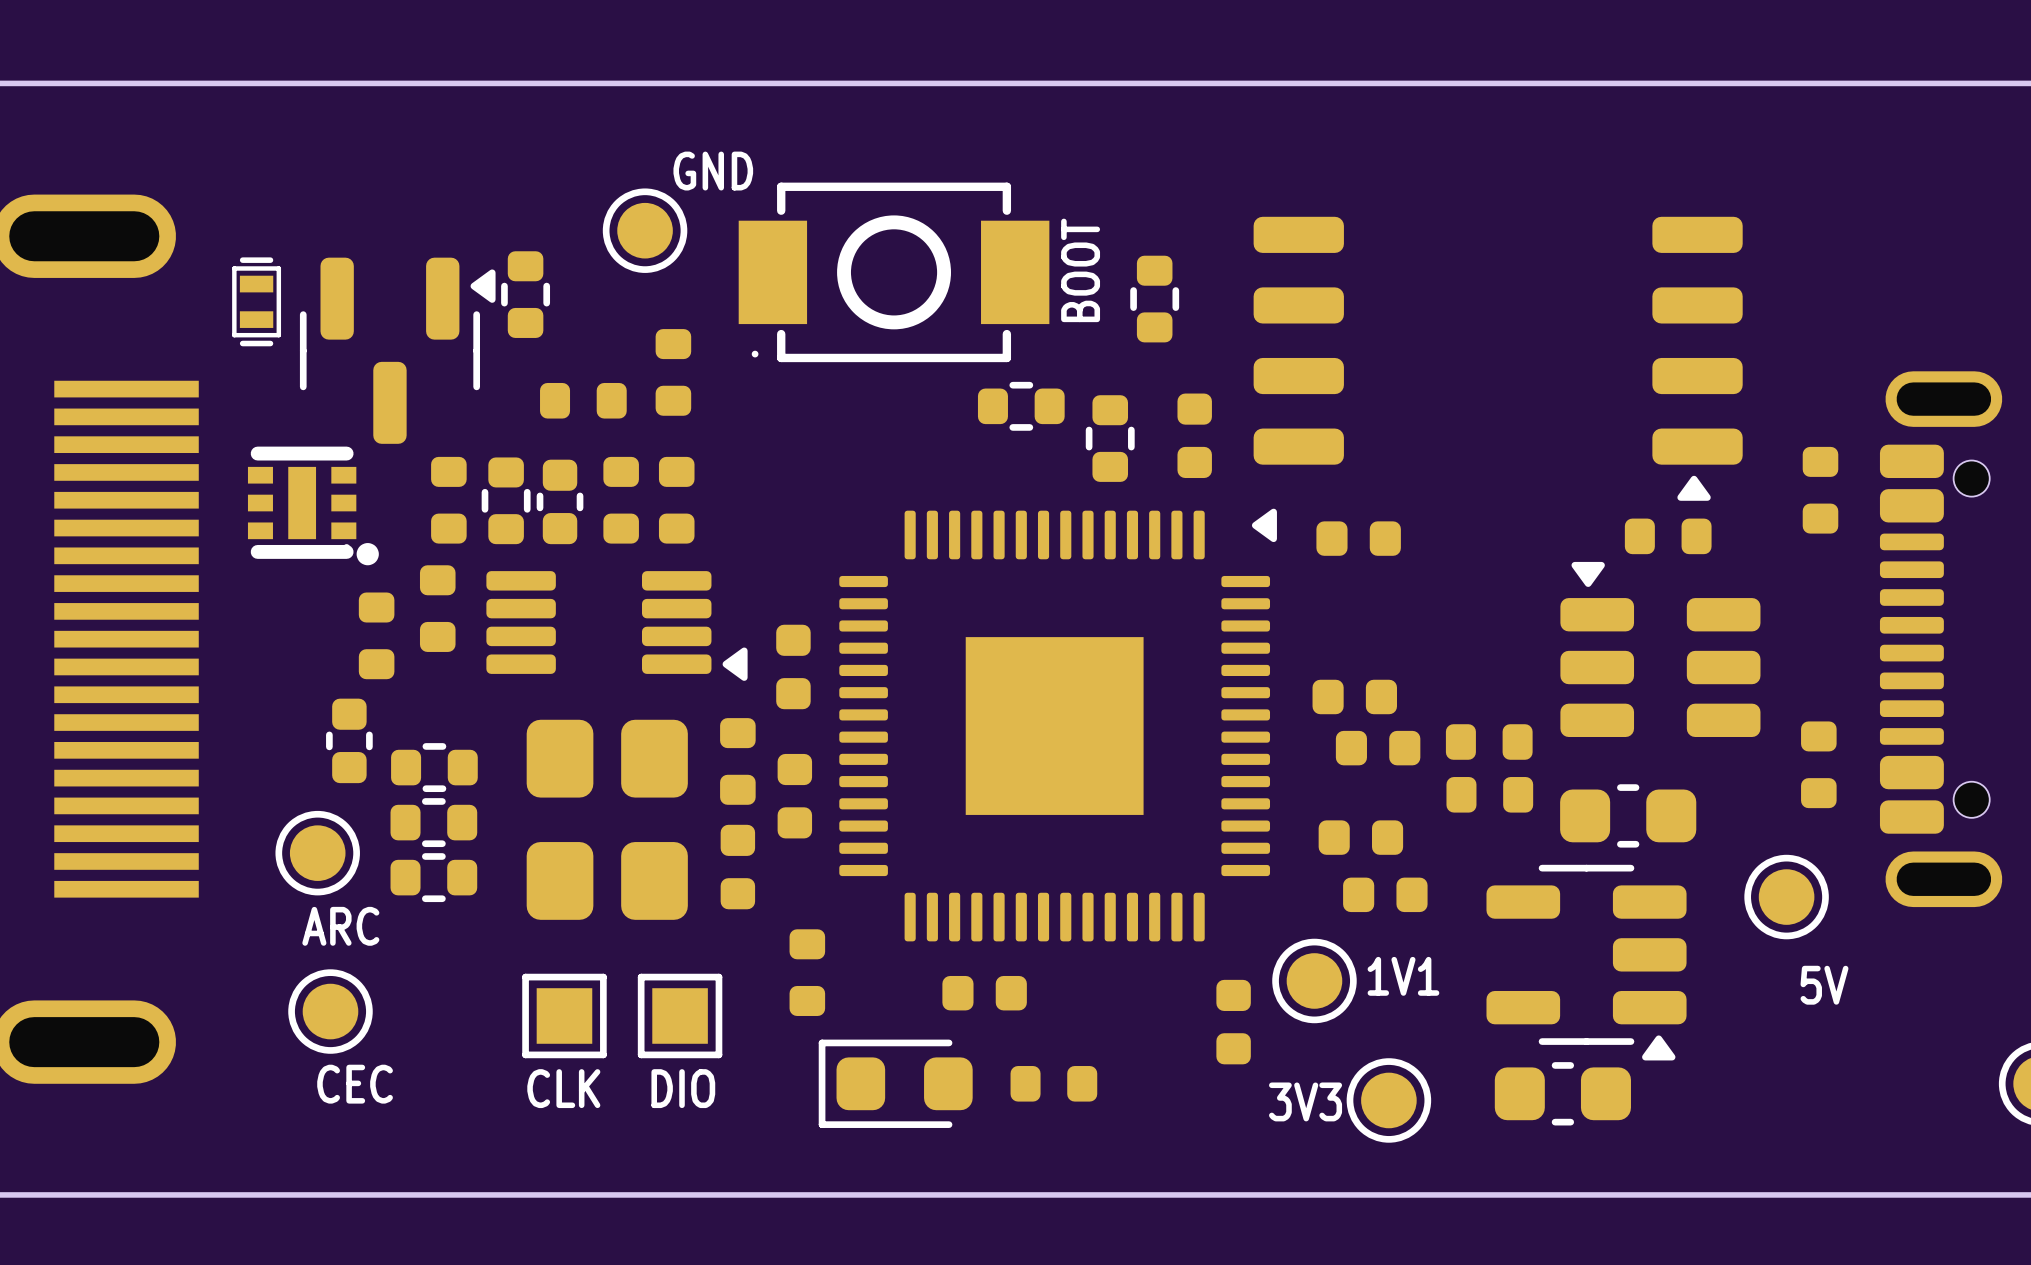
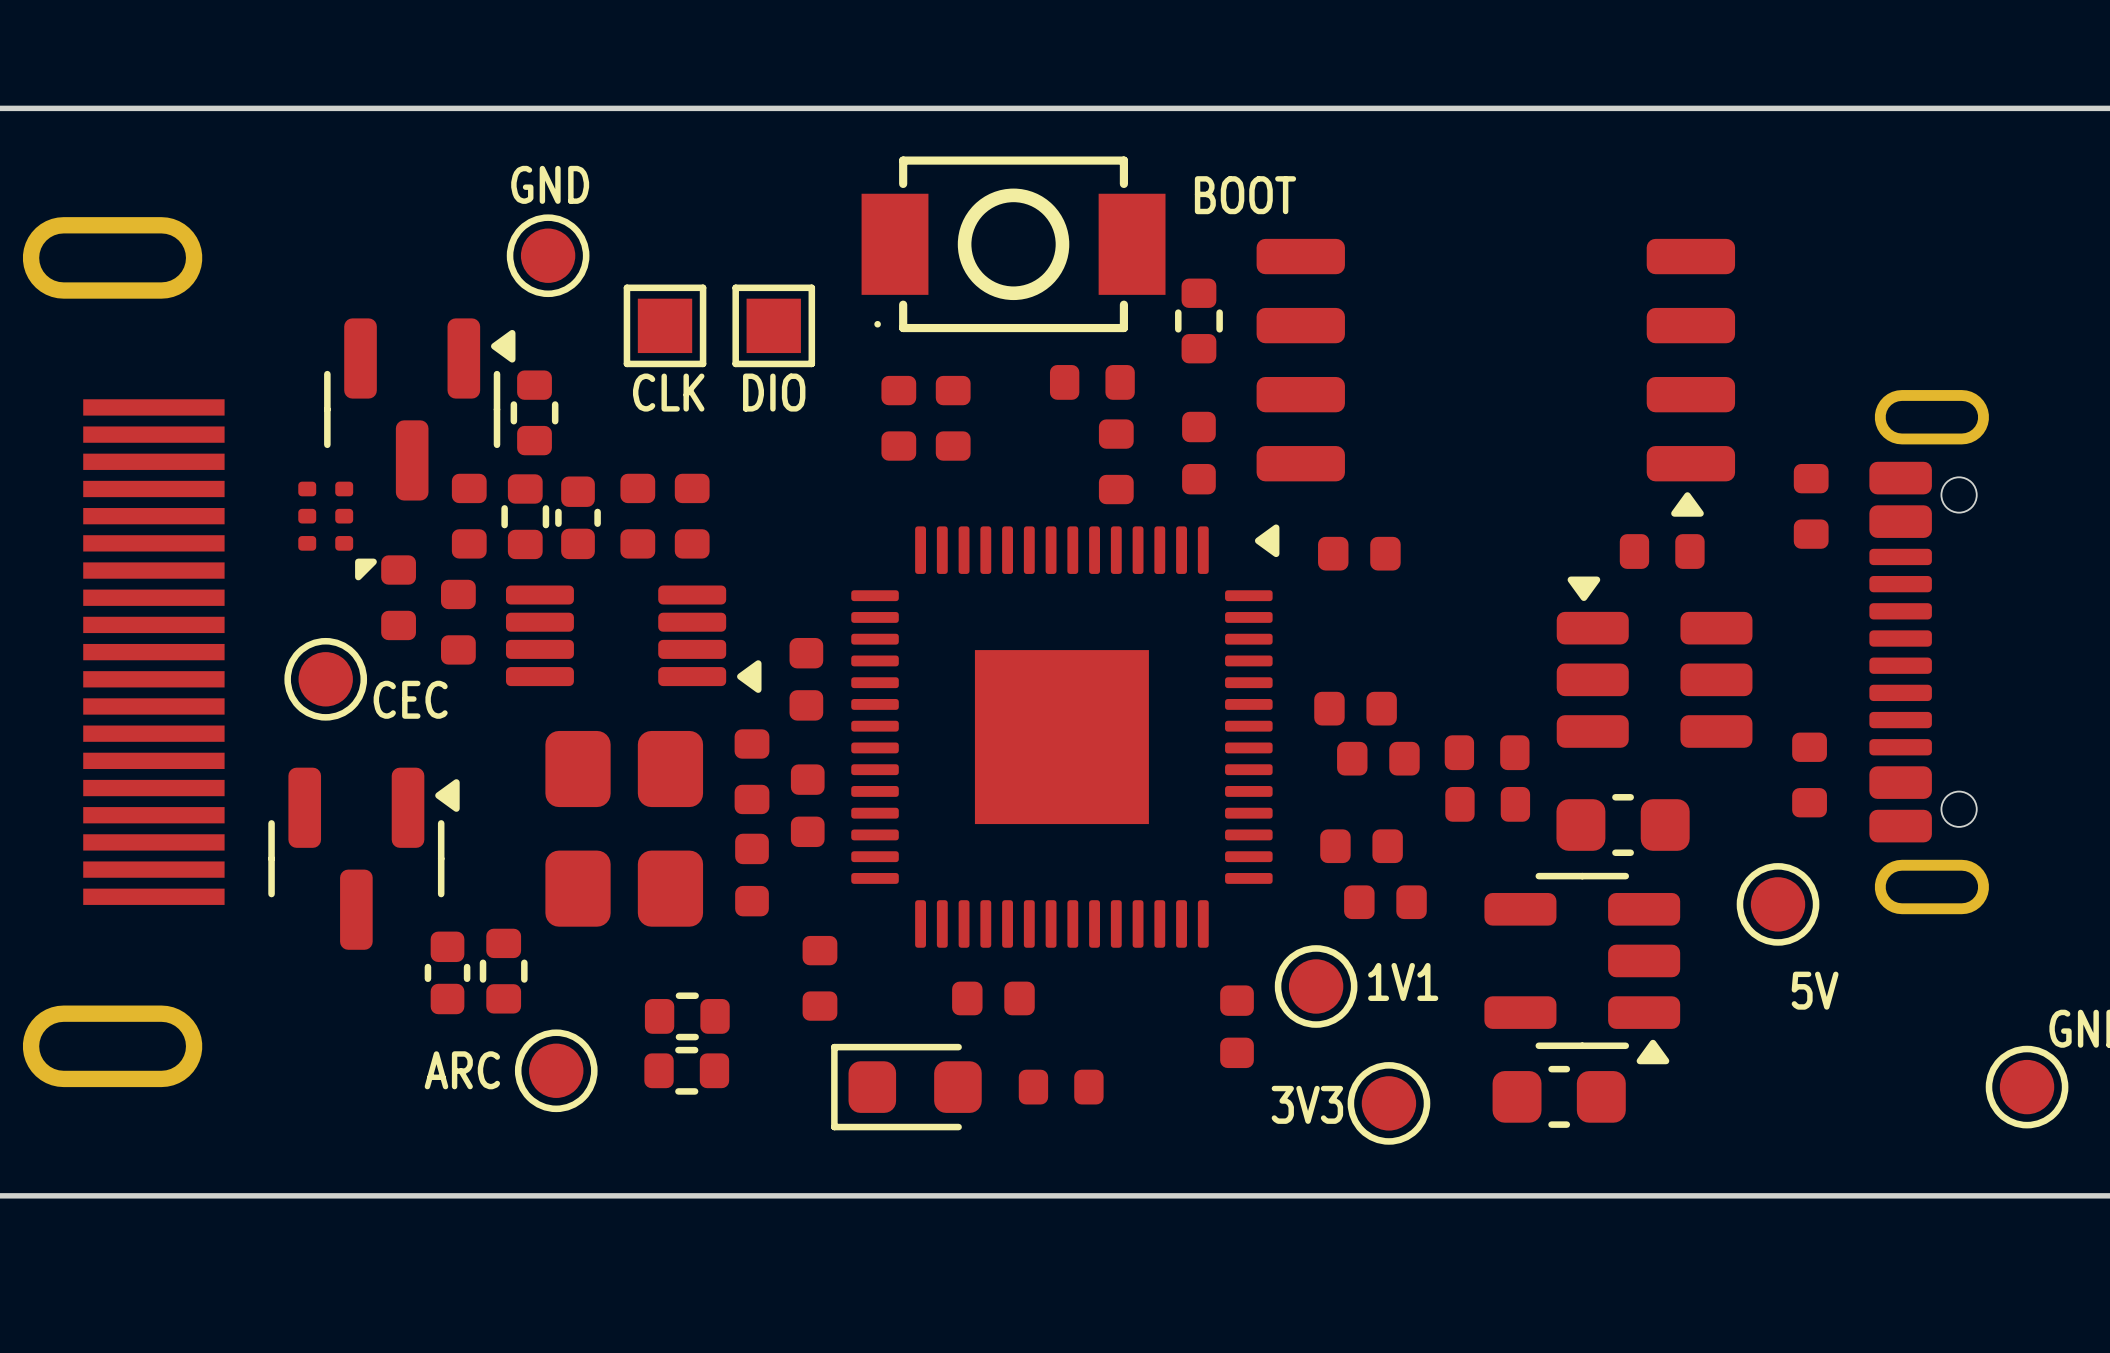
text position: GND (713, 171) -> GND (550, 184)
part position: (645, 230) -> (548, 255)
text rotation: 0° (1080, 270) -> 90° clockwise (1245, 195)
text position: BOOT (1080, 270) -> BOOT (1245, 195)
part position: (894, 272) -> (1013, 244)
part position: (525, 294) -> (534, 412)
part position: (1154, 299) -> (1198, 320)
part: (256, 301) -> none
part: none -> (665, 325)
part: none -> (773, 325)
part position: (397, 350) -> (419, 409)
part: none -> (1092, 382)
part: (673, 372) -> none
part footprint: [1085, 395, 1135, 482] -> [1098, 419, 1134, 505]
part: (583, 400) -> none
part: none -> (898, 418)
part: none -> (953, 418)
part: (1021, 406) -> none
part footprint: [247, 446, 379, 566] -> [298, 481, 377, 581]
part position: (376, 635) -> (398, 597)
part: none -> (325, 679)
part position: (349, 740) -> (447, 972)
part: (434, 767) -> none
part footprint: [275, 810, 360, 896] -> [268, 767, 460, 950]
part: (433, 822) -> none
part: (433, 877) -> none
text position: ARC (340, 926) -> ARC (462, 1070)
part: none -> (503, 971)
part footprint: [637, 973, 723, 1059] -> [644, 992, 730, 1041]
part: (330, 1011) -> none
part: (564, 1015) -> none
part: none -> (556, 1070)
part: none -> (686, 1070)
text position: CEC (355, 1084) -> CEC (410, 699)
text position: CLK (563, 1088) -> CLK (668, 392)
text position: DIO (683, 1088) -> DIO (774, 392)

